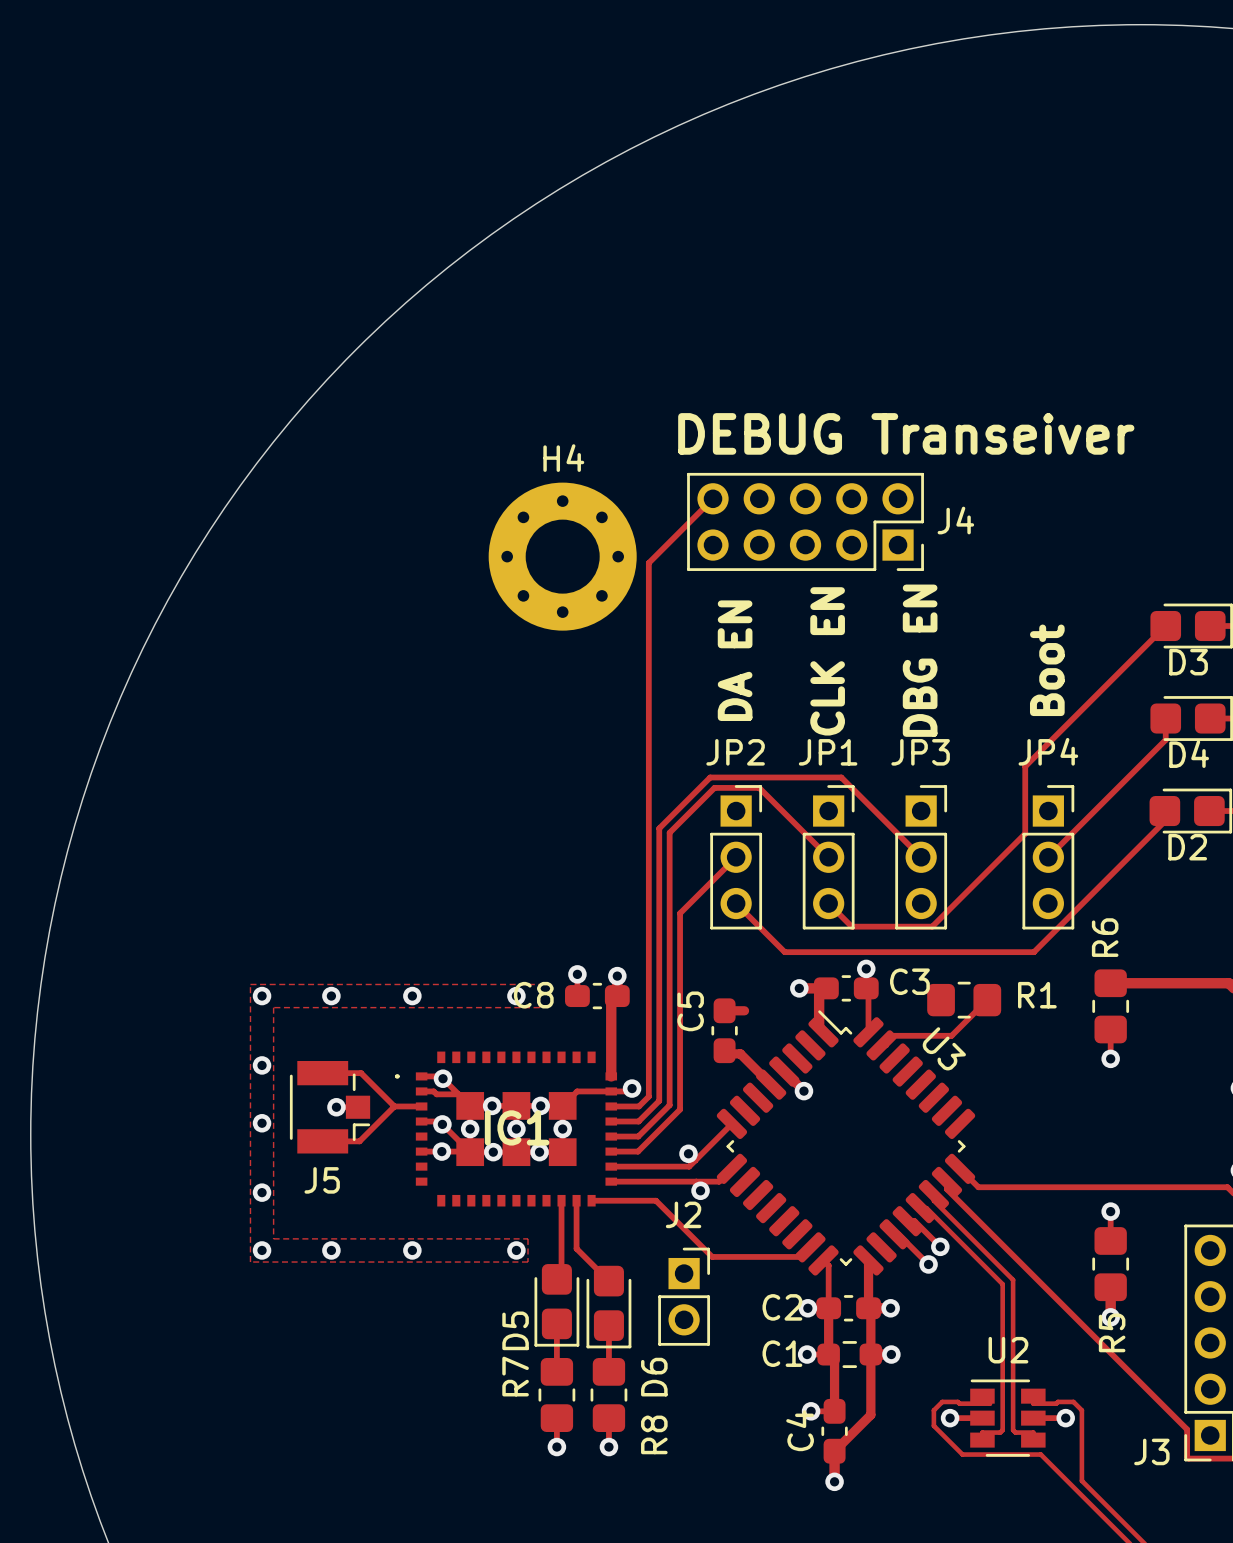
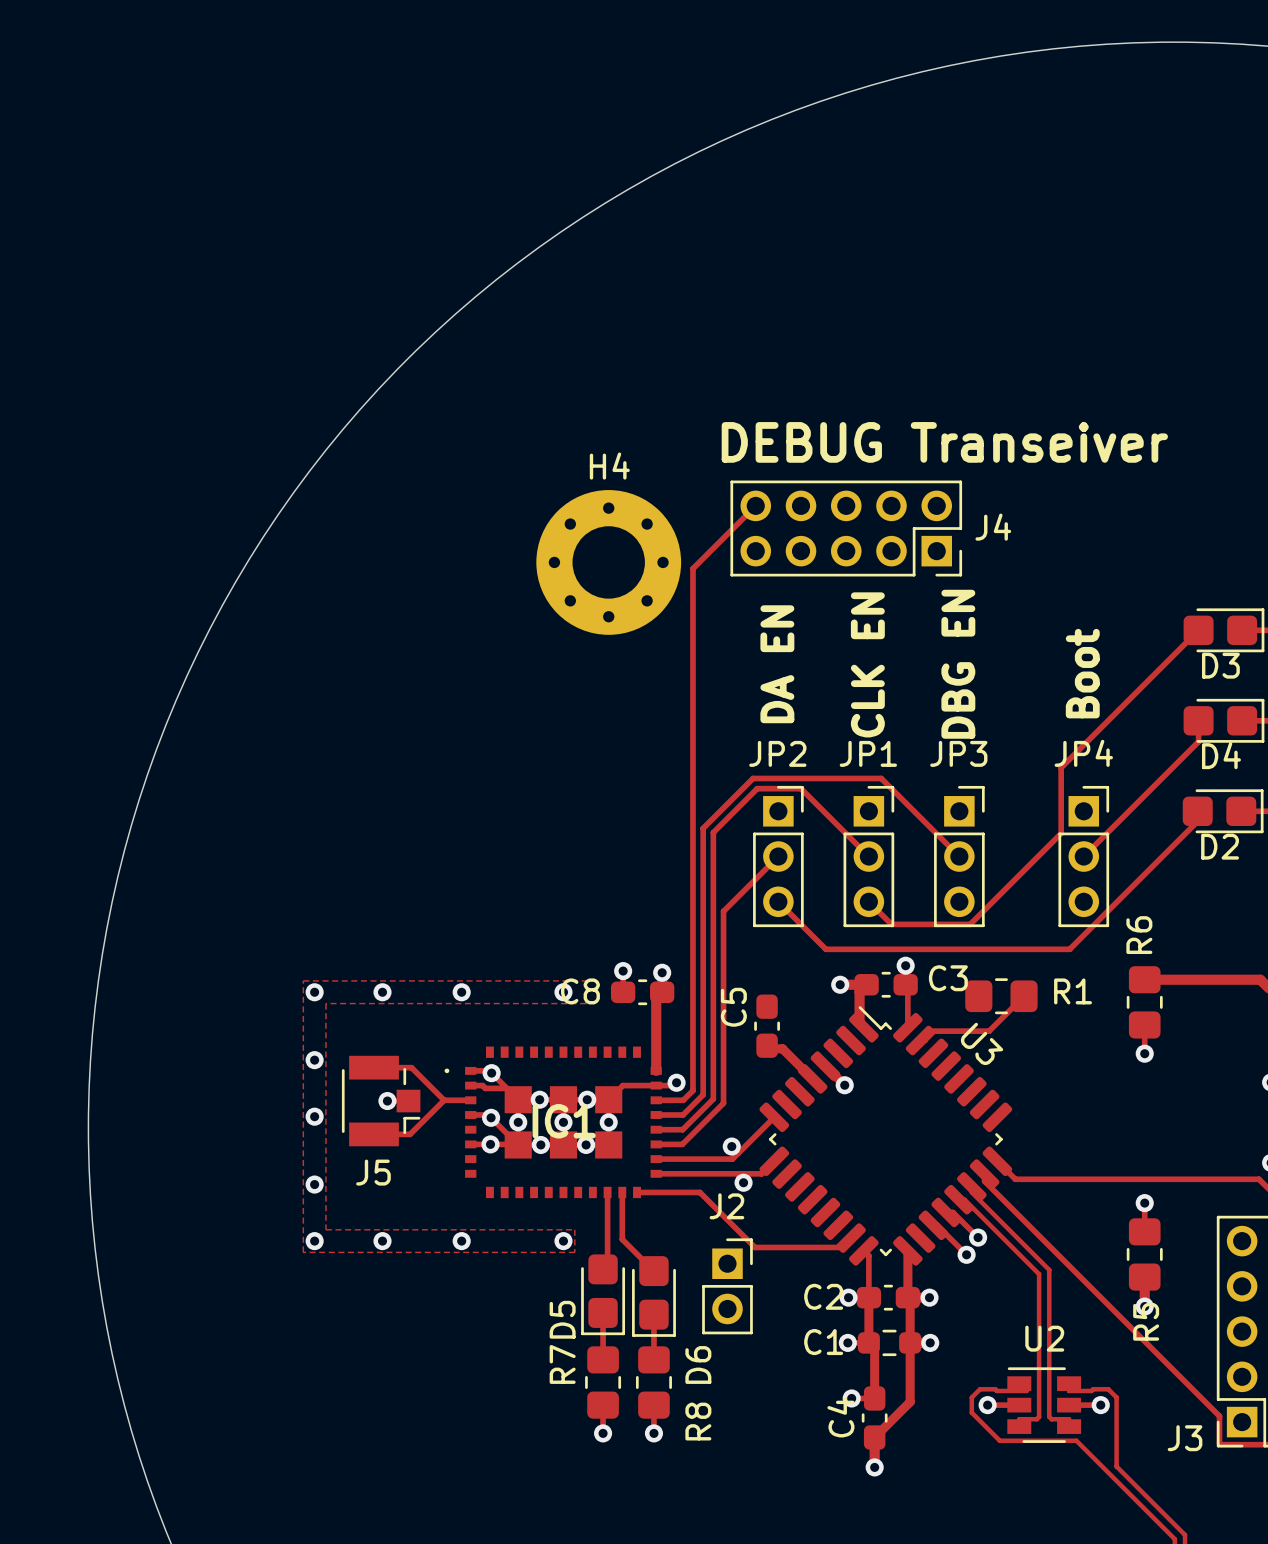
track: (724, 1010) (744, 1010) -> none

